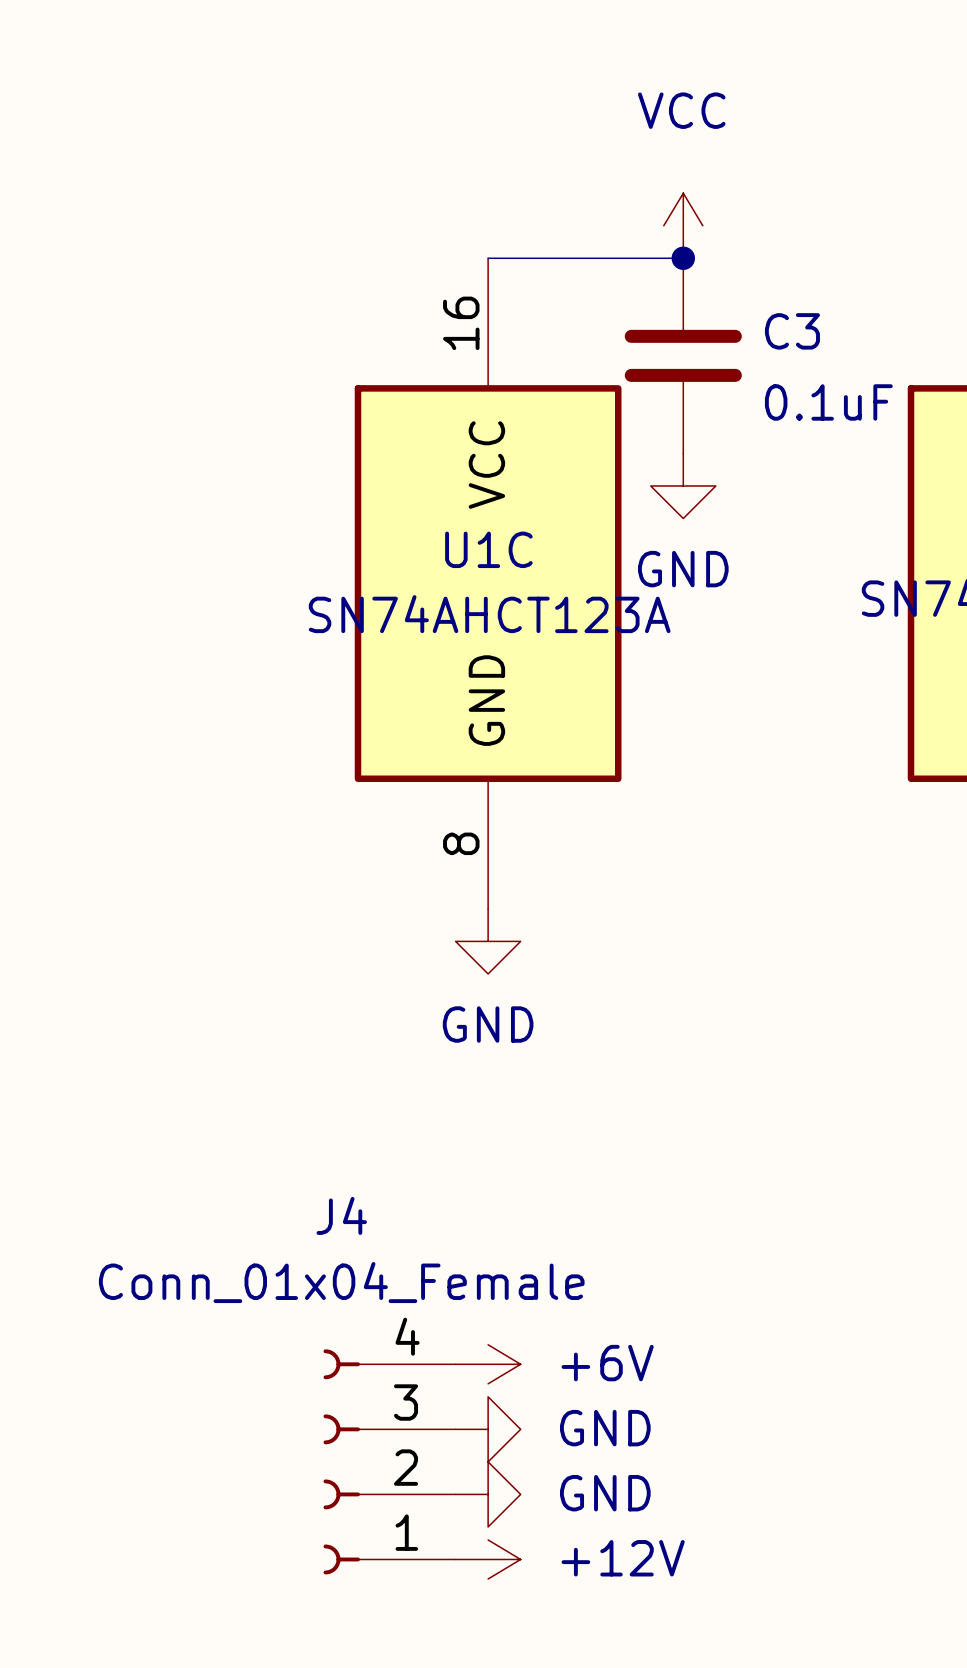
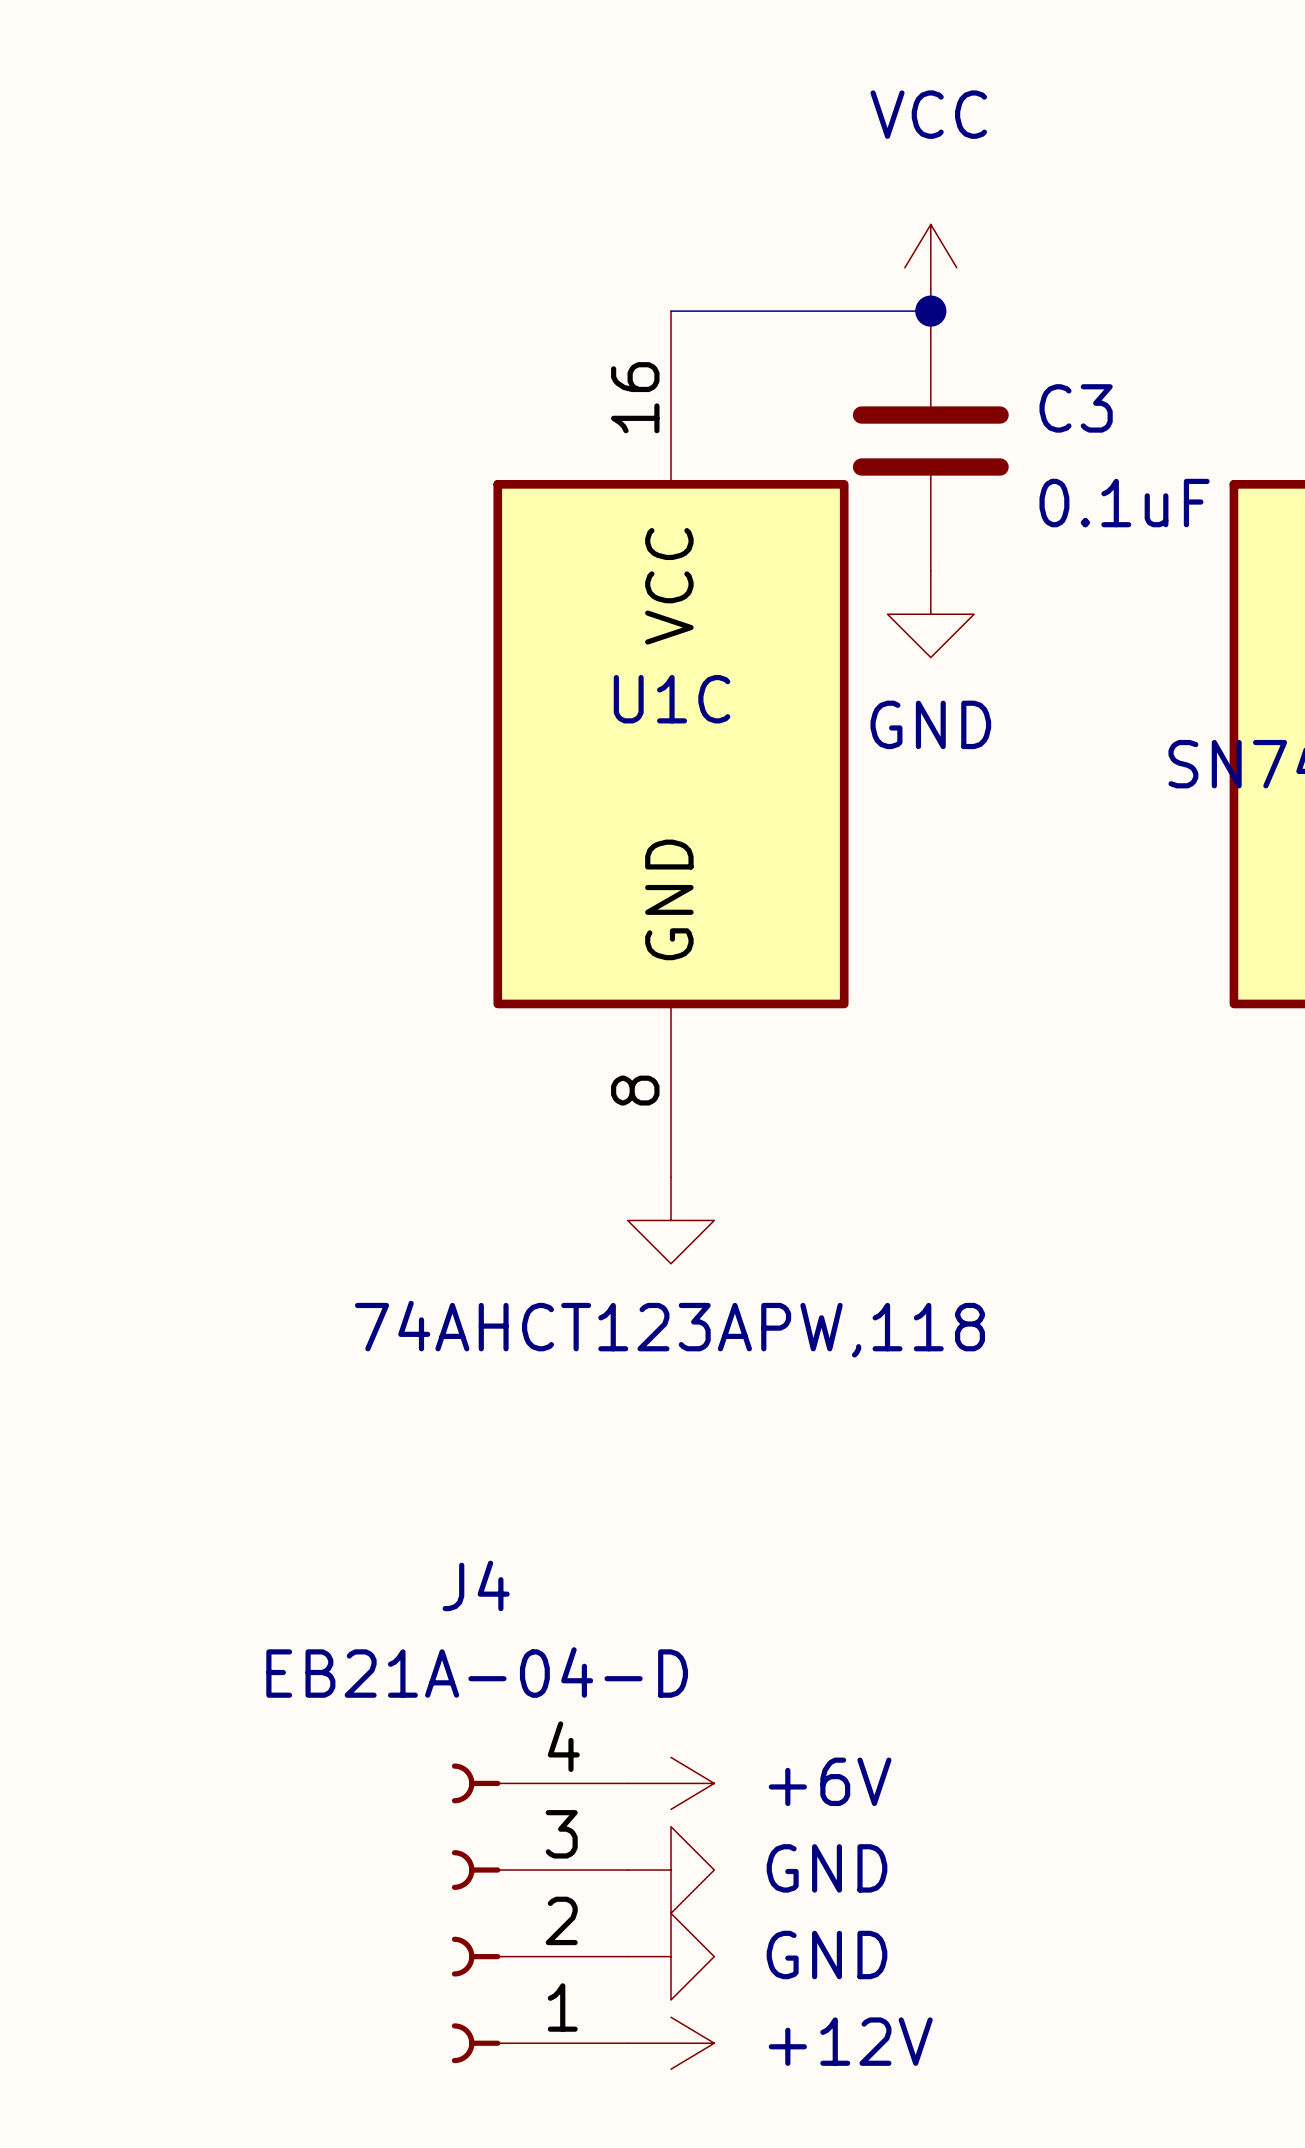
U1C value: SN74AHCT123A (489, 614) -> 74AHCT123APW,118 (669, 1329)
power symbol text: GND (488, 1024) -> none
J4 value: Conn_01x04_Female (341, 1282) -> EB21A-04-D (477, 1672)

